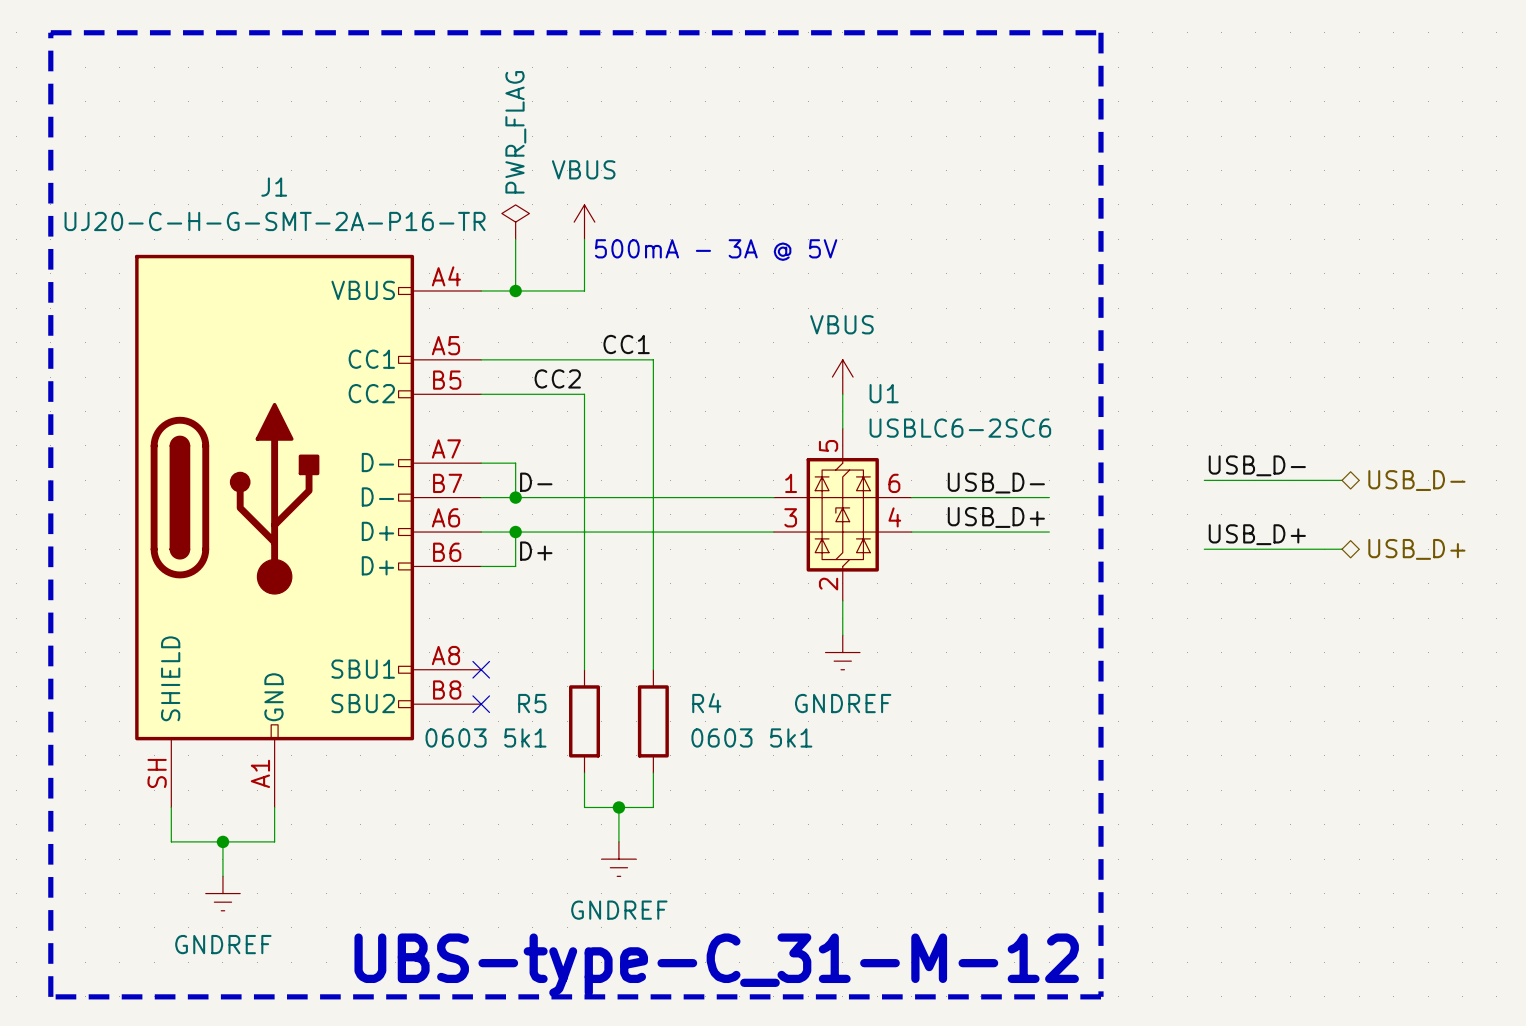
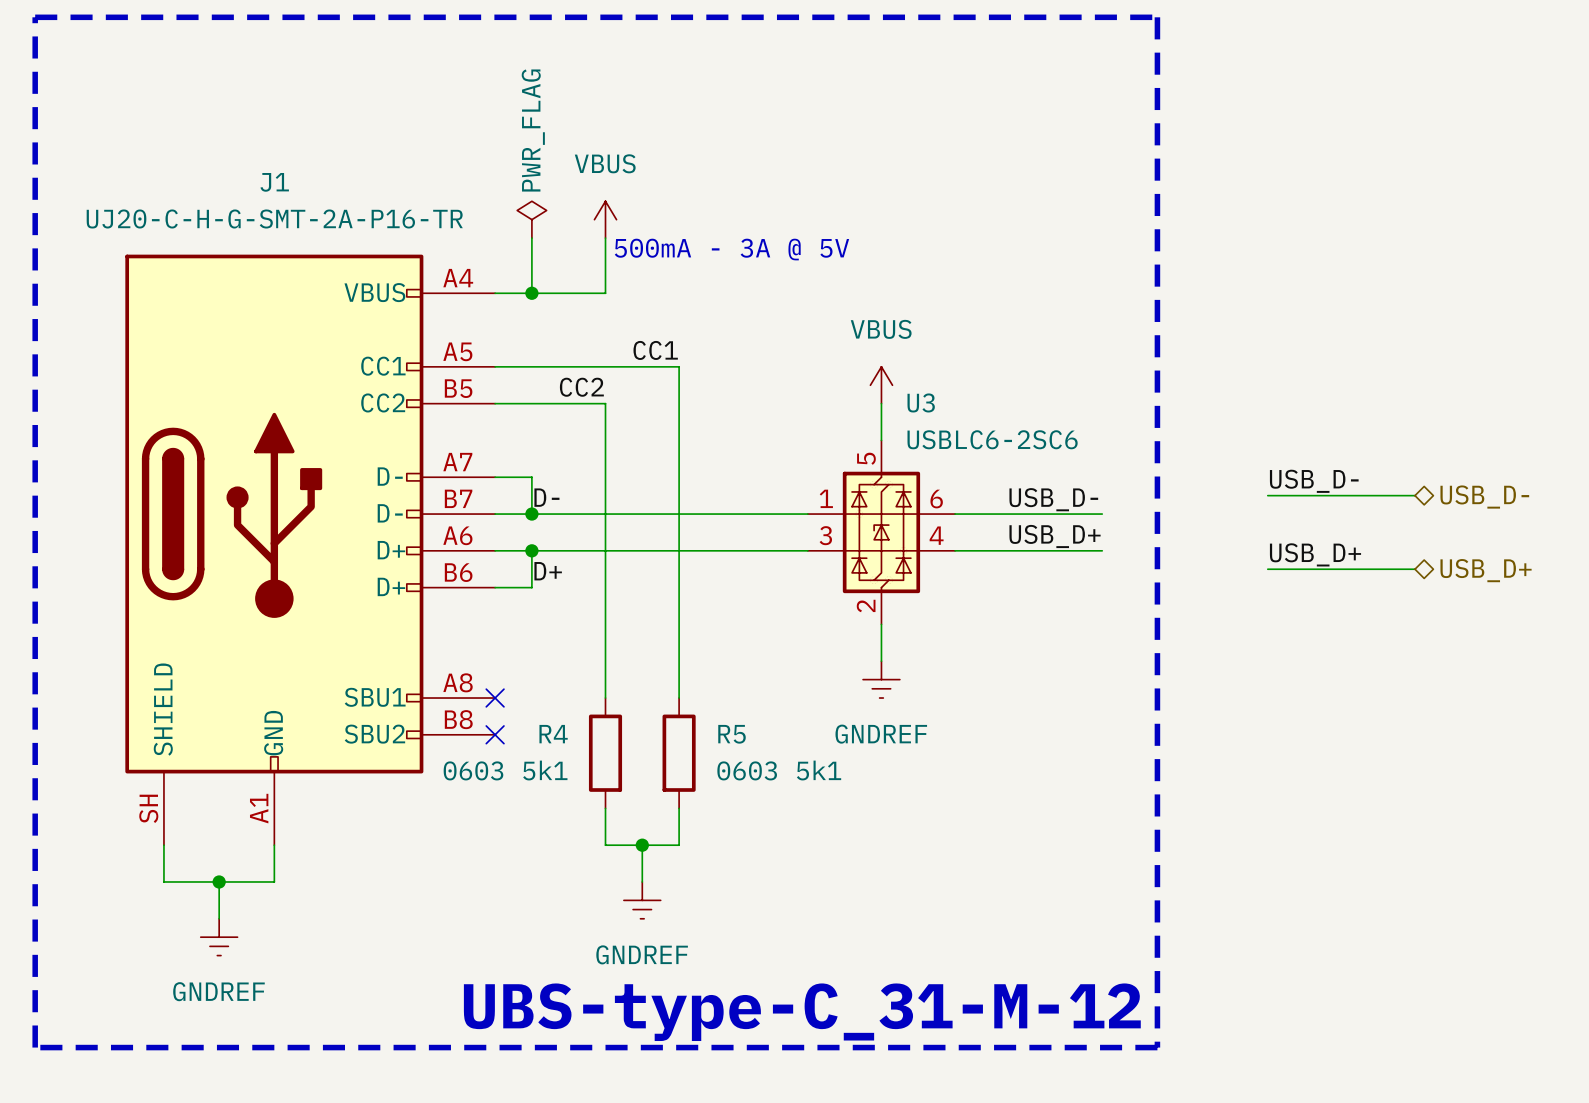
U1 name: U1 (884, 393) -> U3 (921, 402)
R5 name: R5 (532, 703) -> R4 (553, 734)
R4 name: R4 (706, 703) -> R5 (732, 734)

